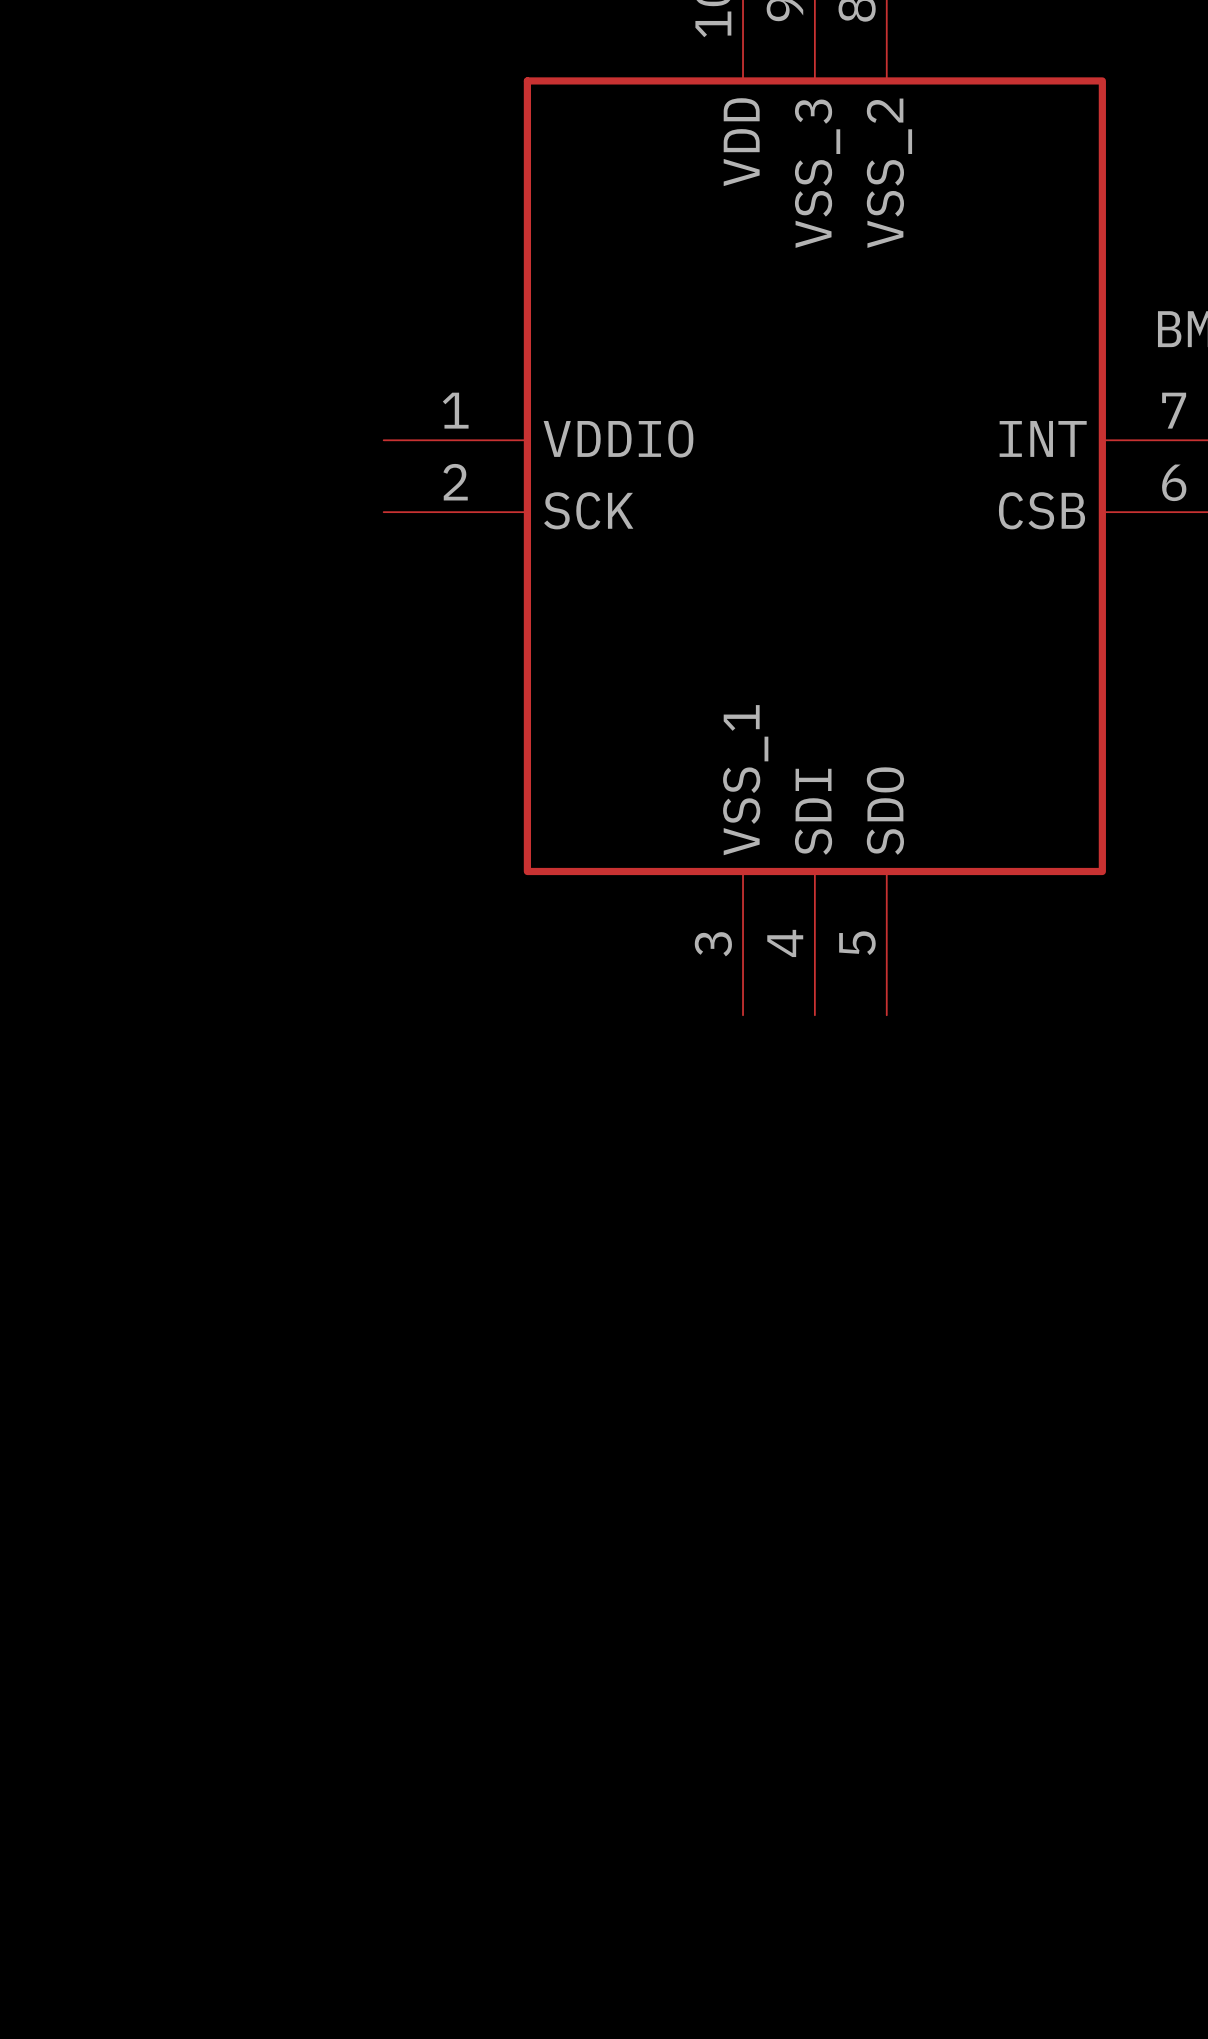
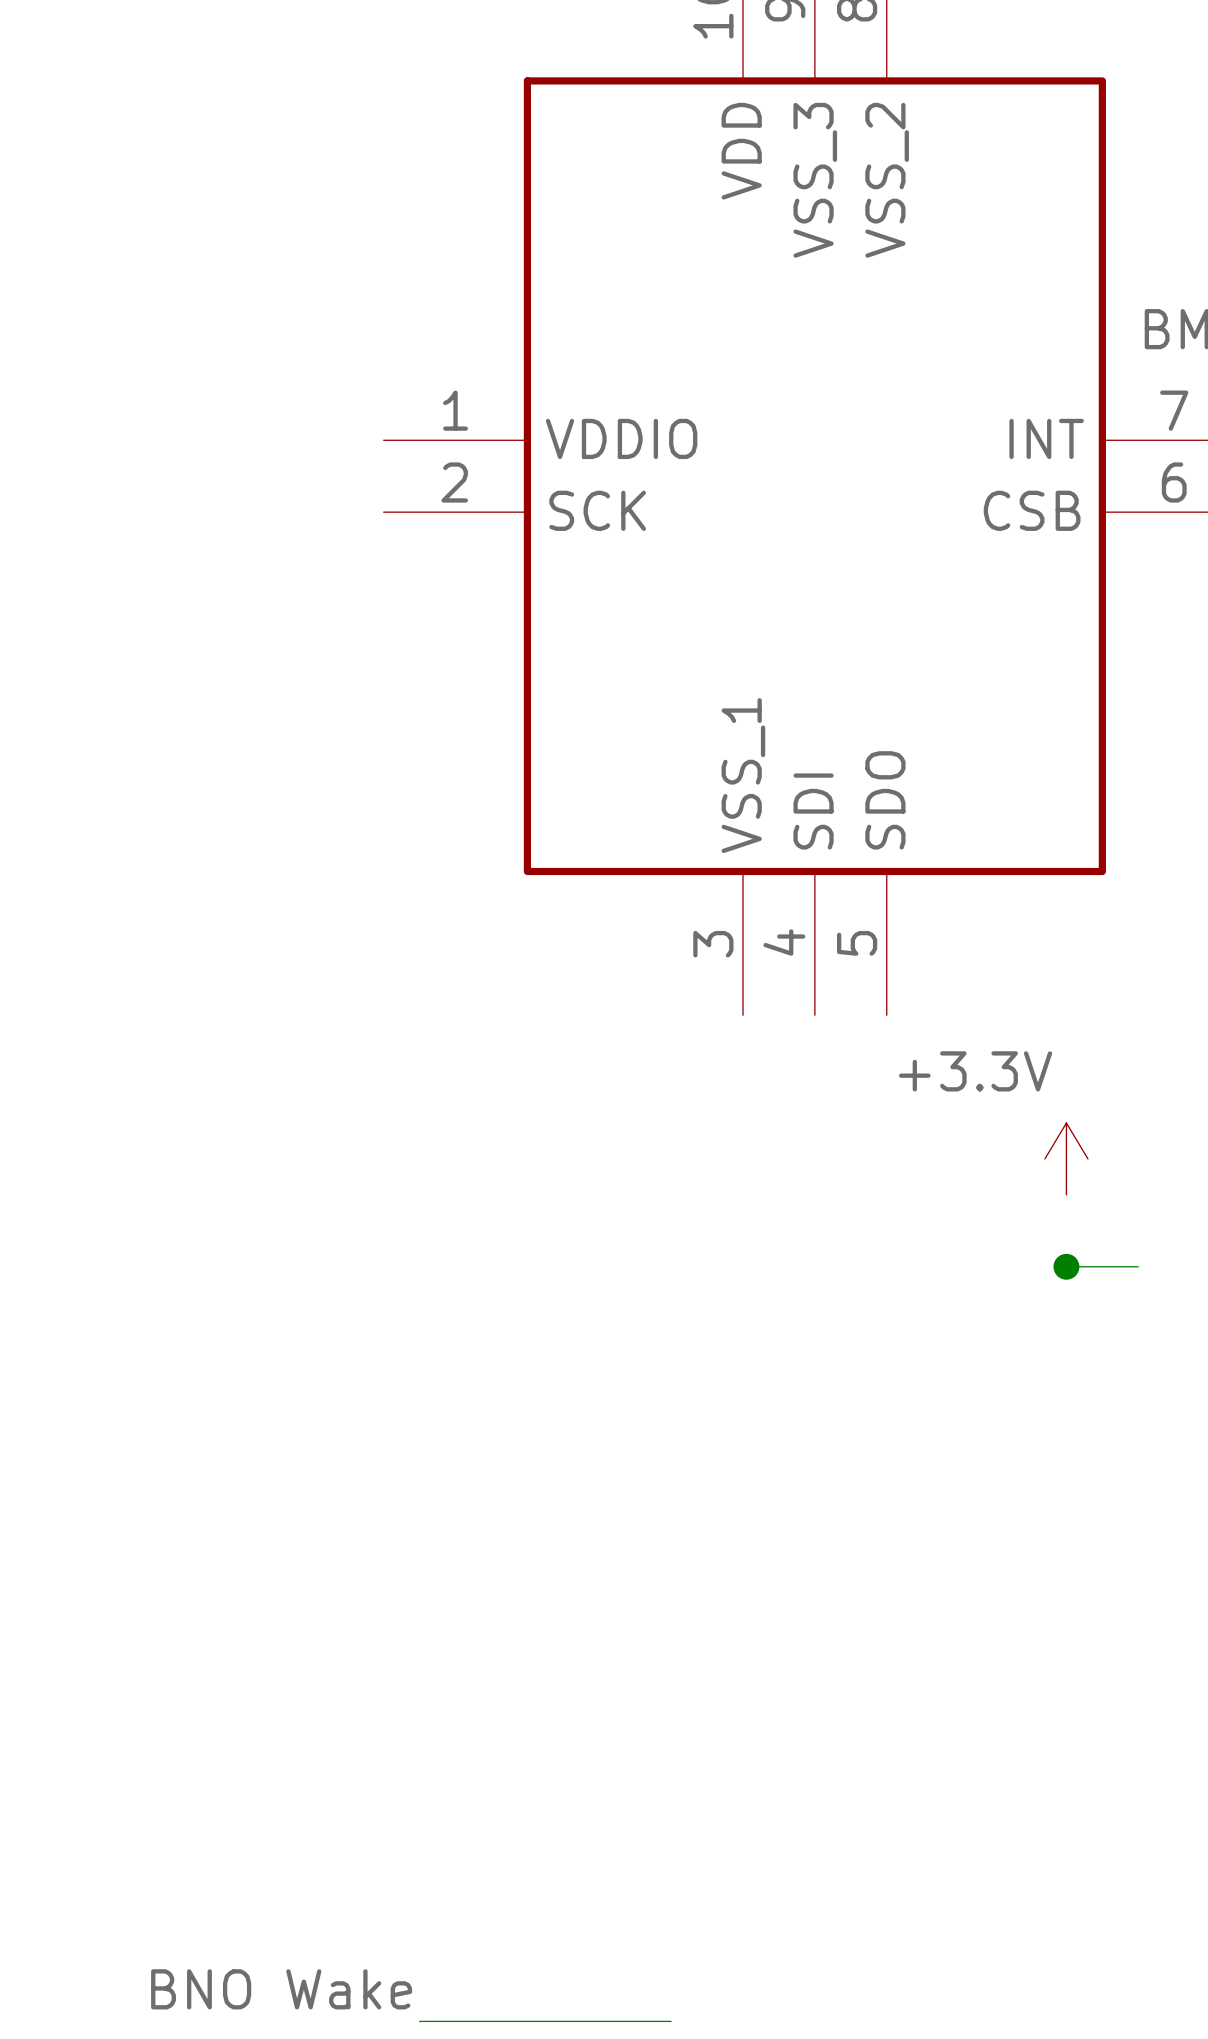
power symbol: none -> +3.3V (1066, 1158)
wire: none -> (1066, 1266) (1138, 1266)
junction: none -> (1066, 1266)
label: none -> BNO Wake (281, 1989)
wire: none -> (419, 2021) (671, 2021)

